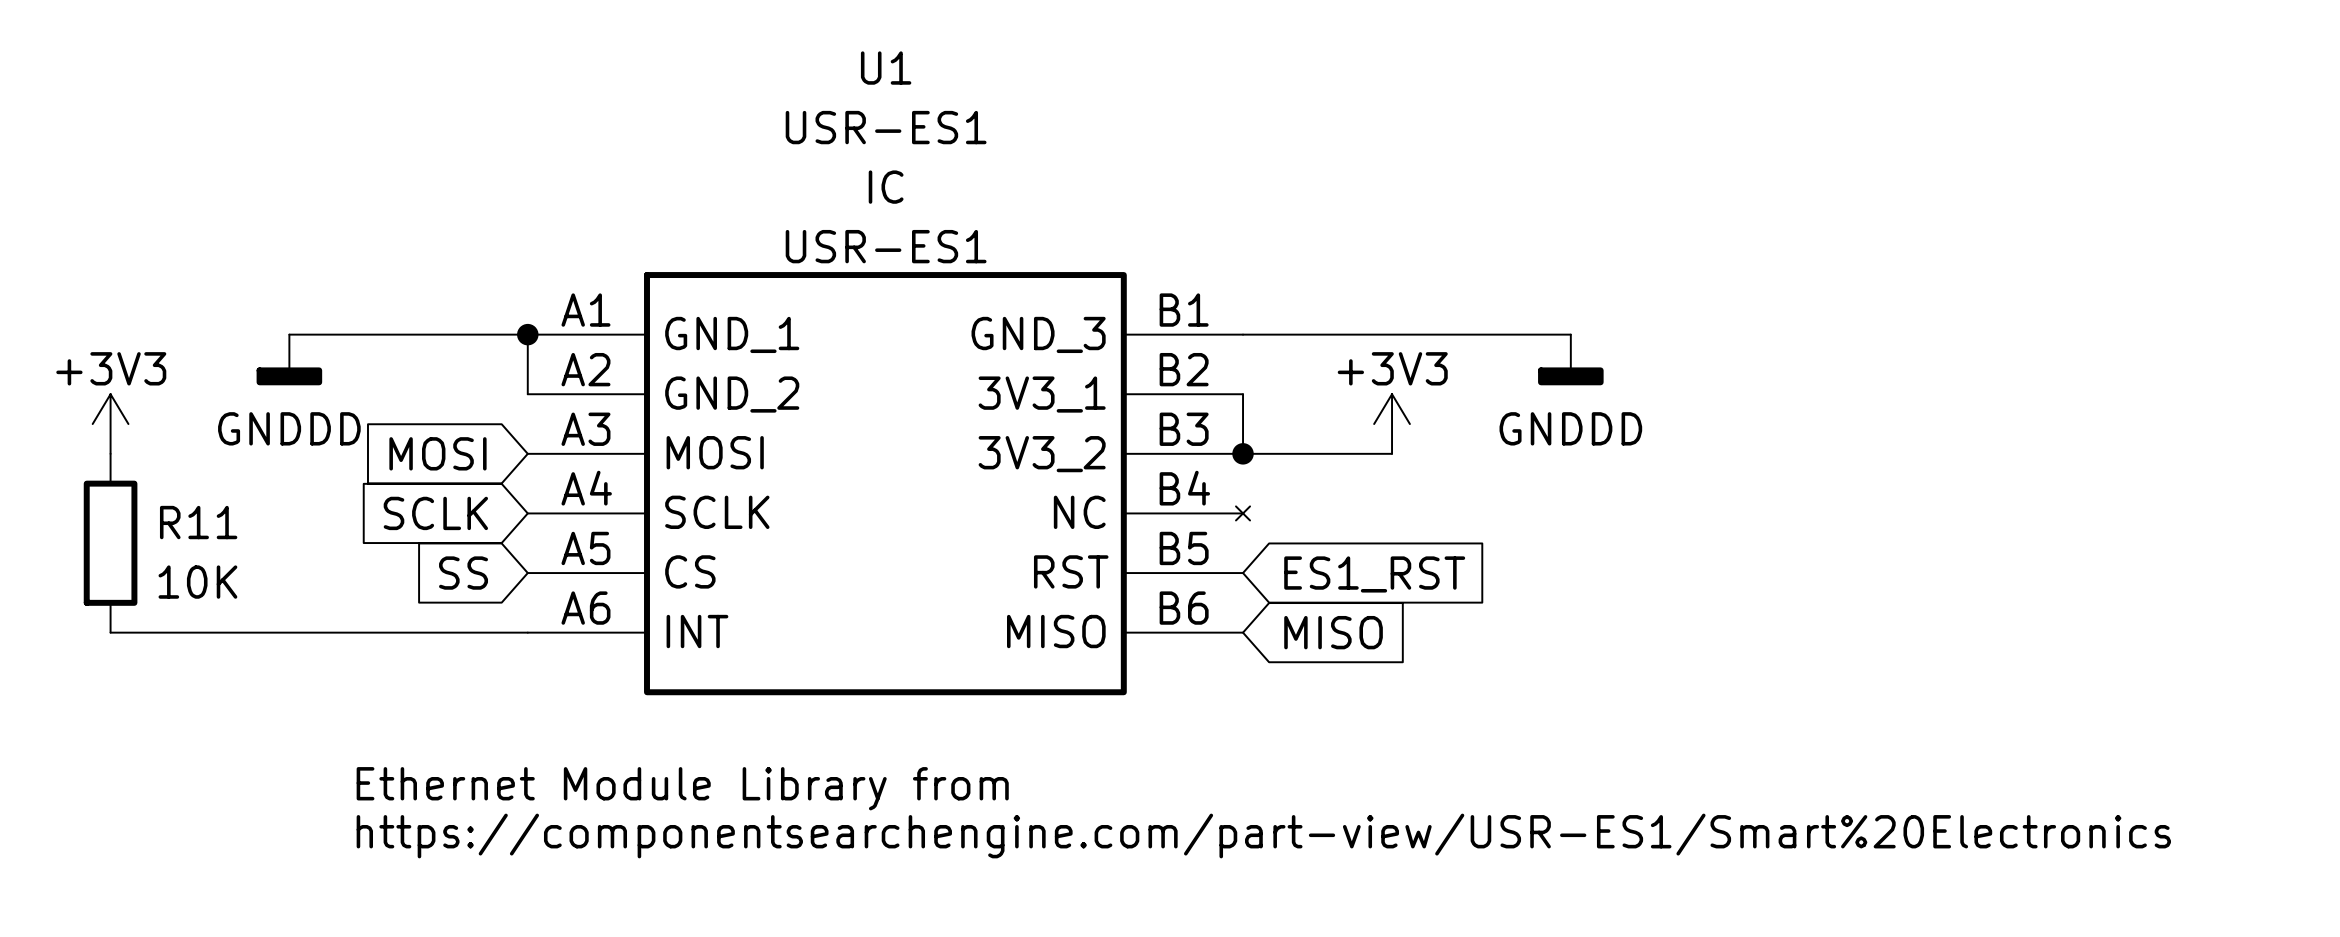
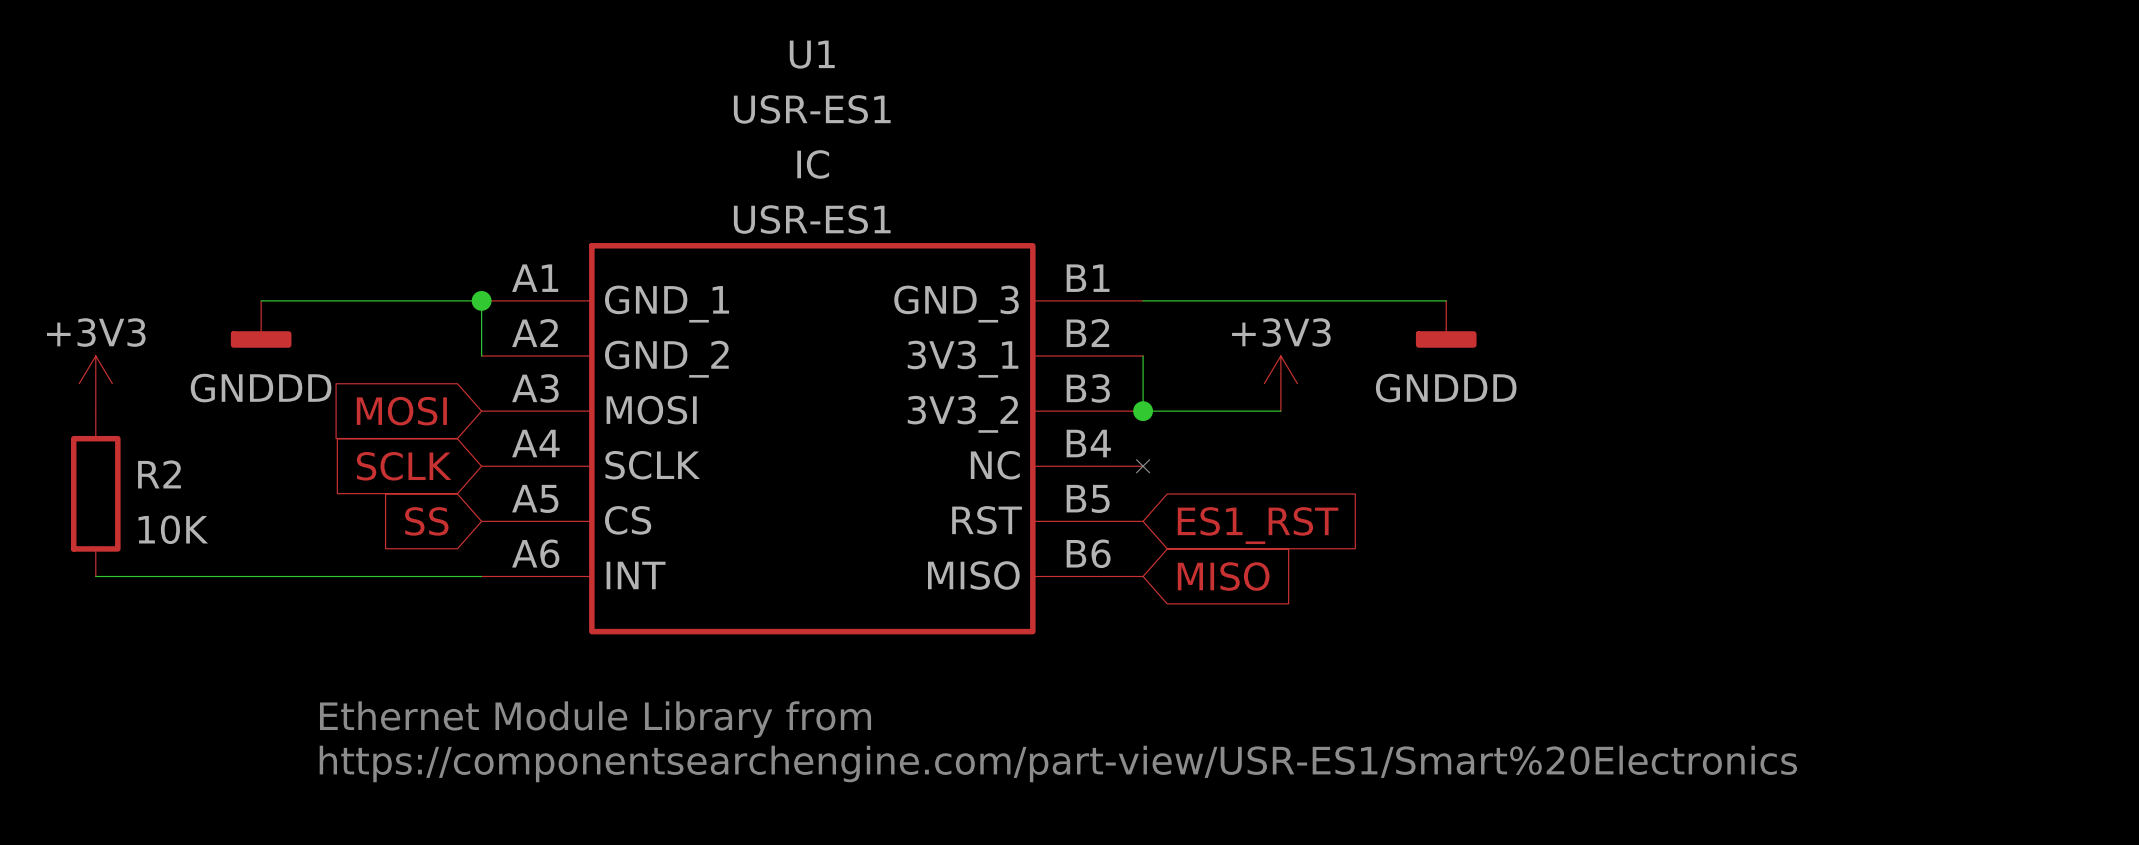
R11 name: R11 (198, 522) -> R2 (159, 474)

